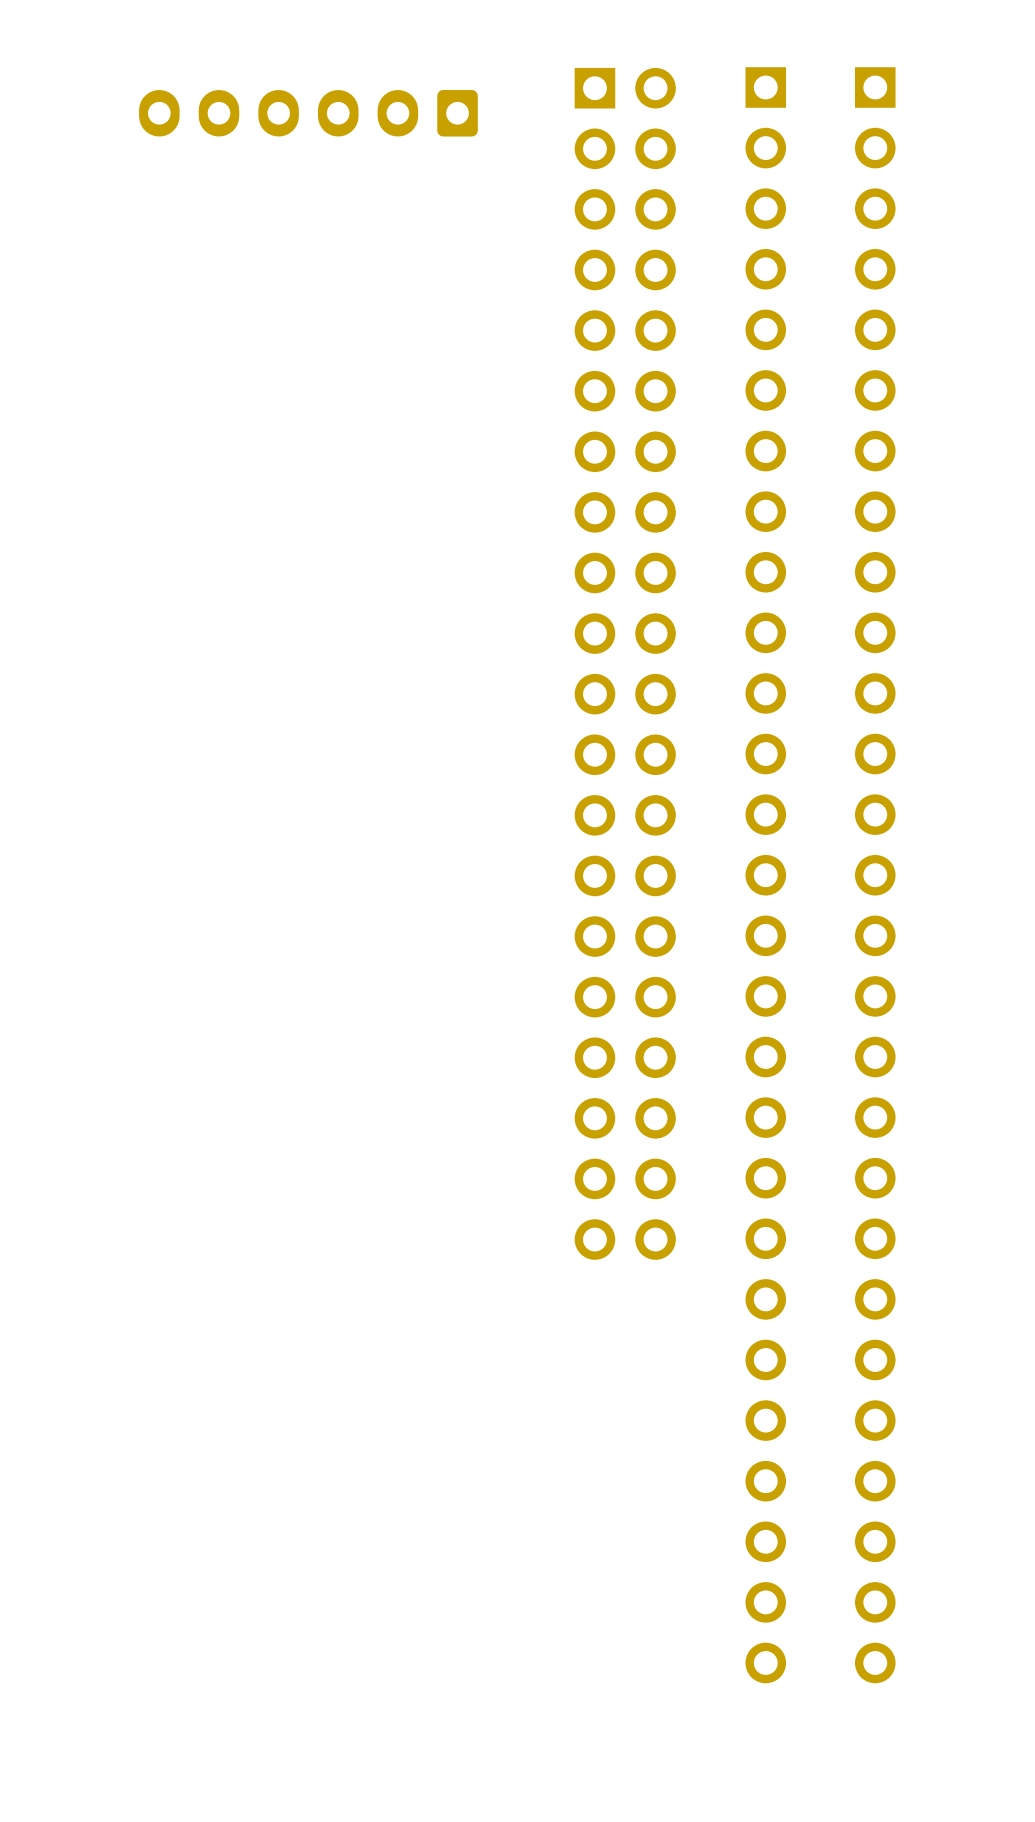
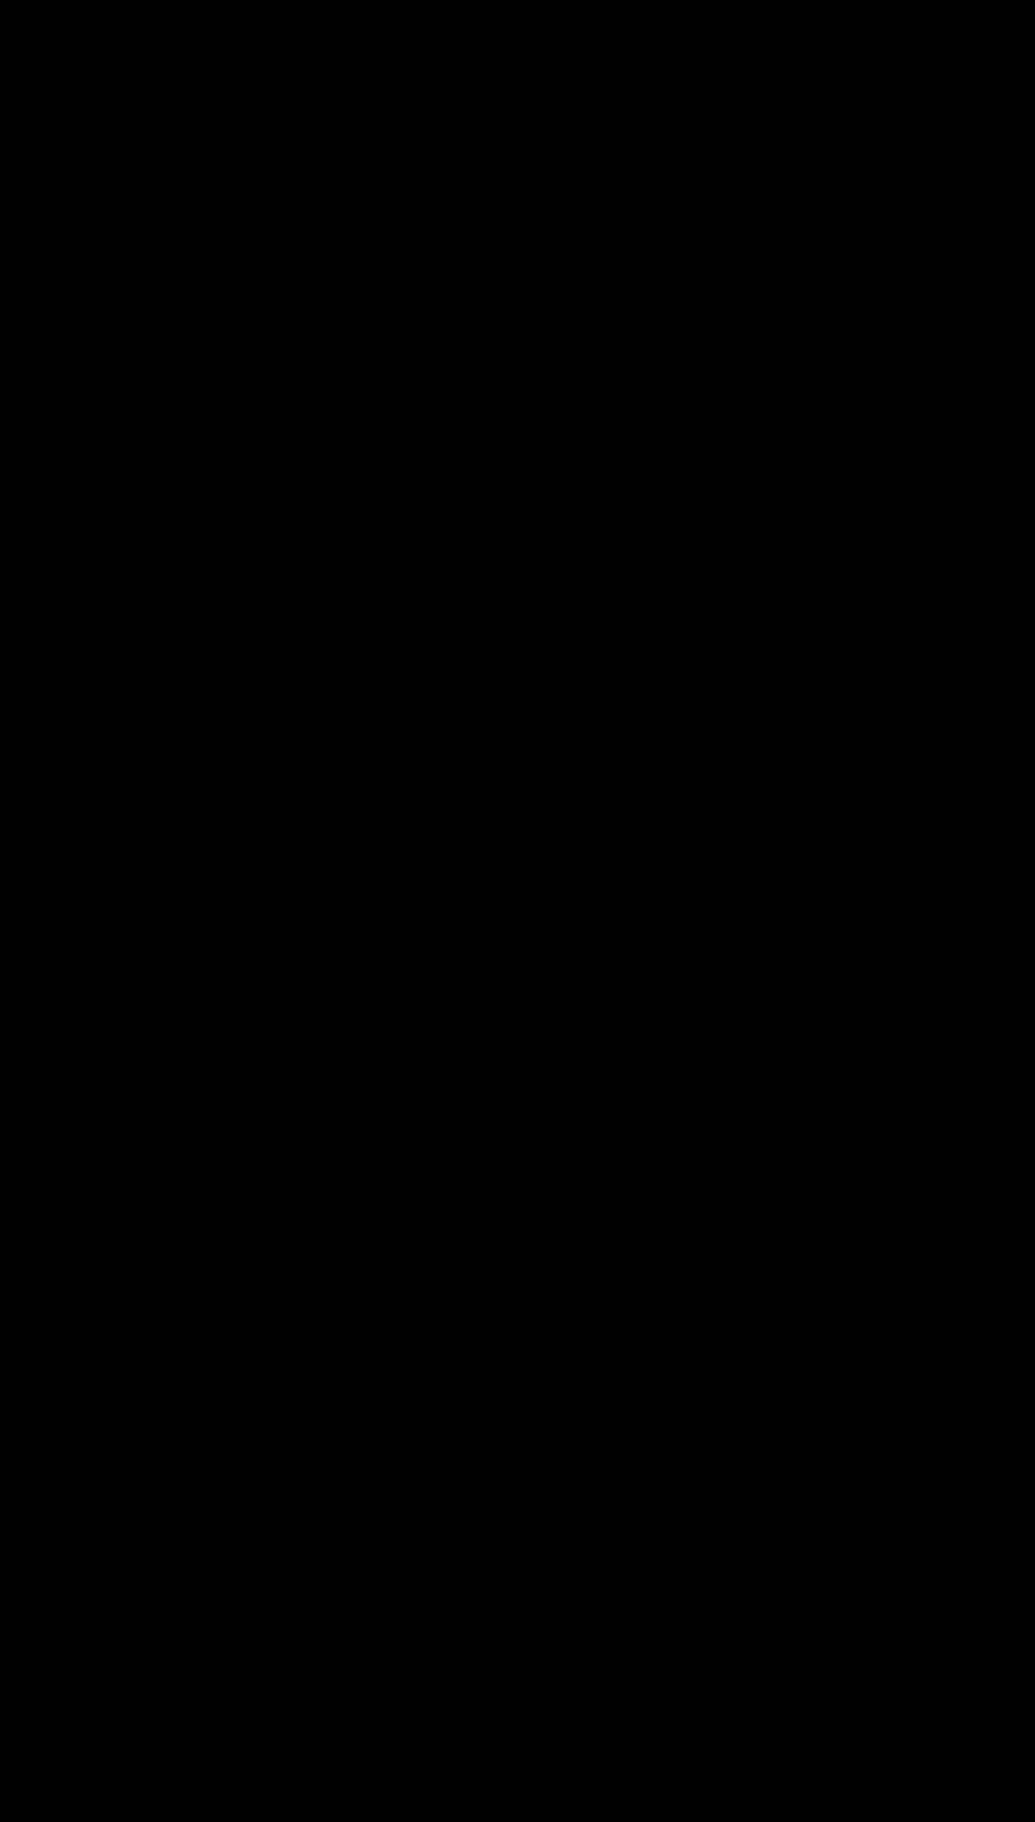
part: (308, 113) -> none
part: (625, 663) -> none
part: (765, 875) -> none
part: (875, 875) -> none

